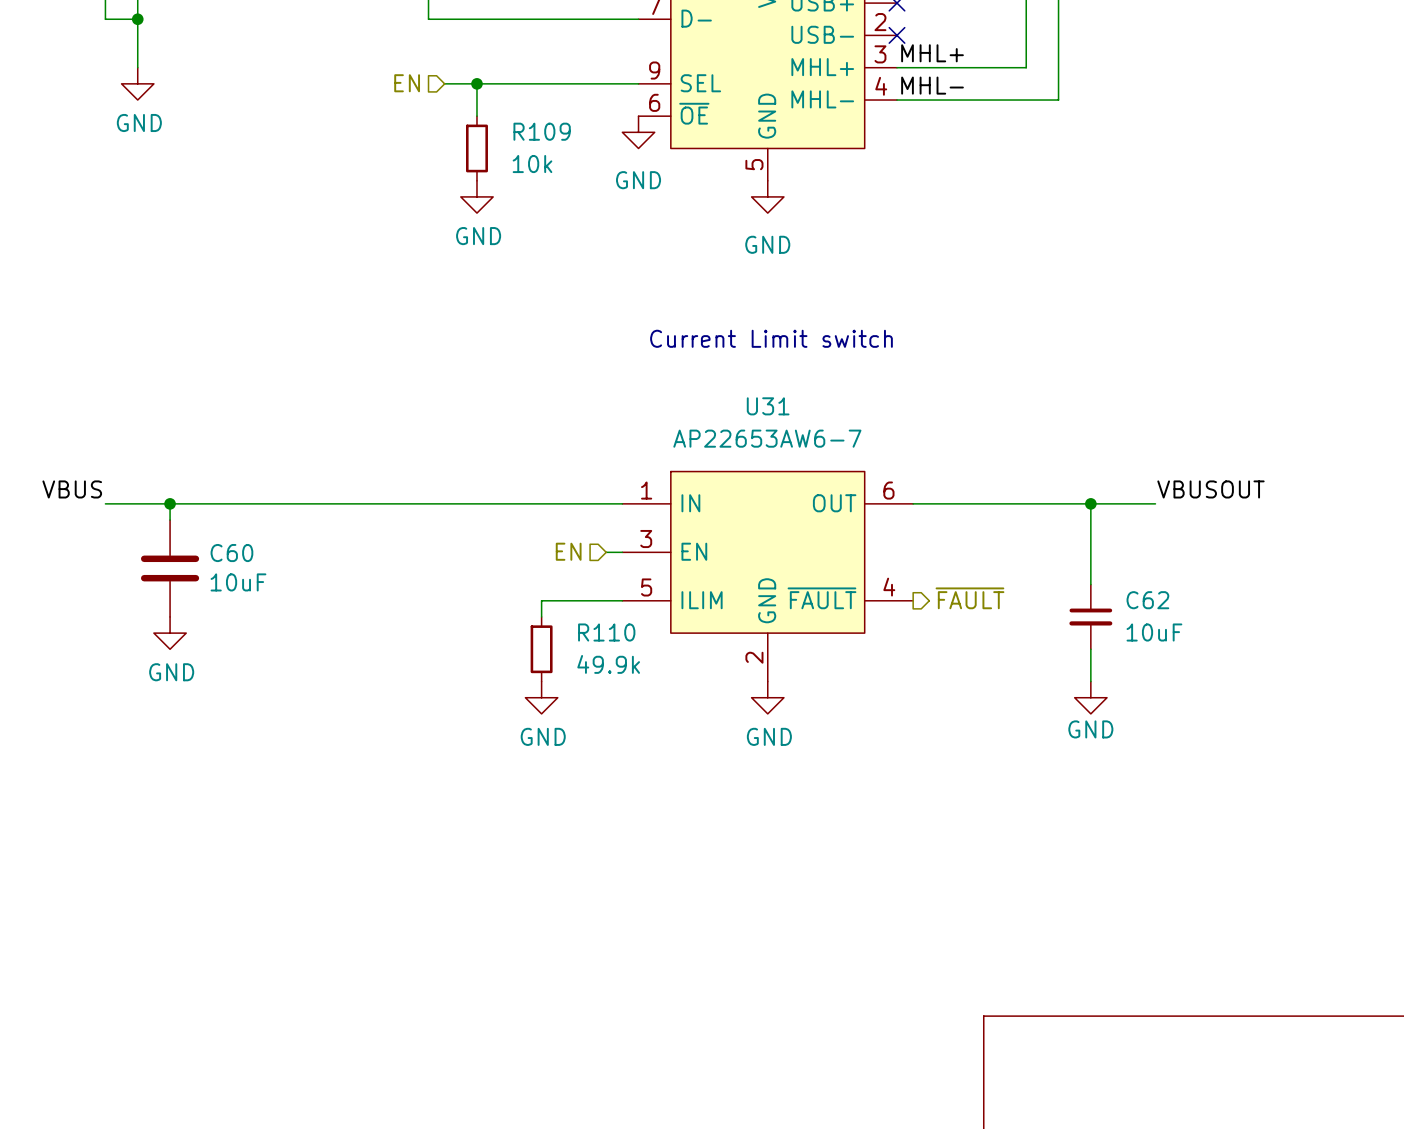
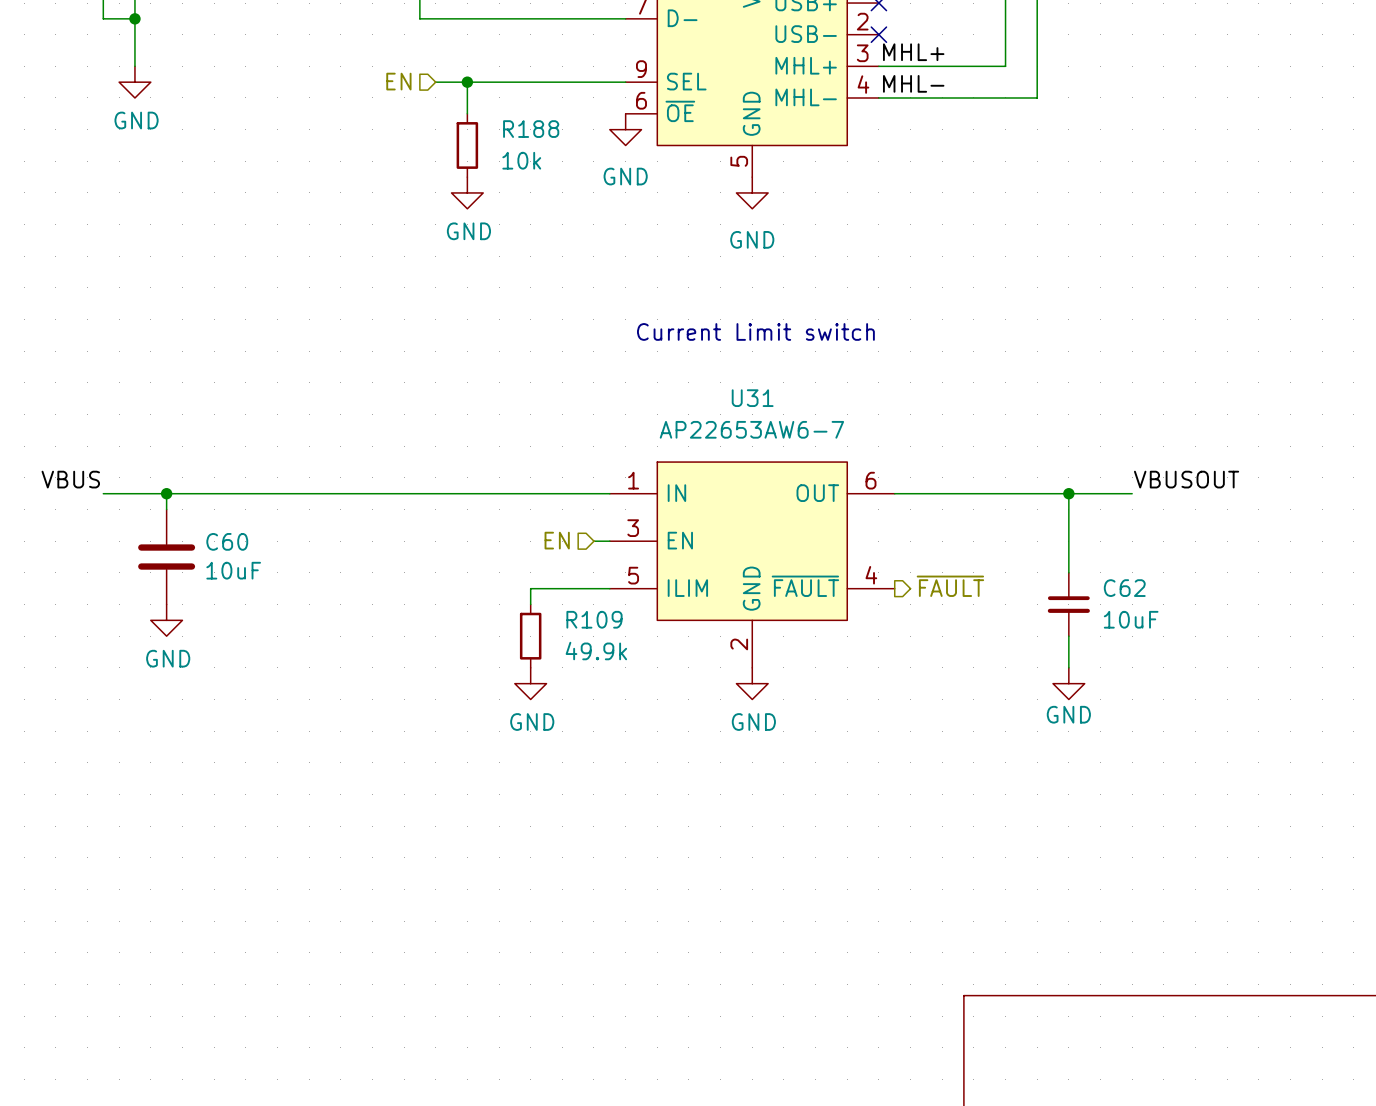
R109 name: R109 (542, 131) -> R188 (531, 129)
R110 name: R110 (606, 632) -> R109 (594, 619)

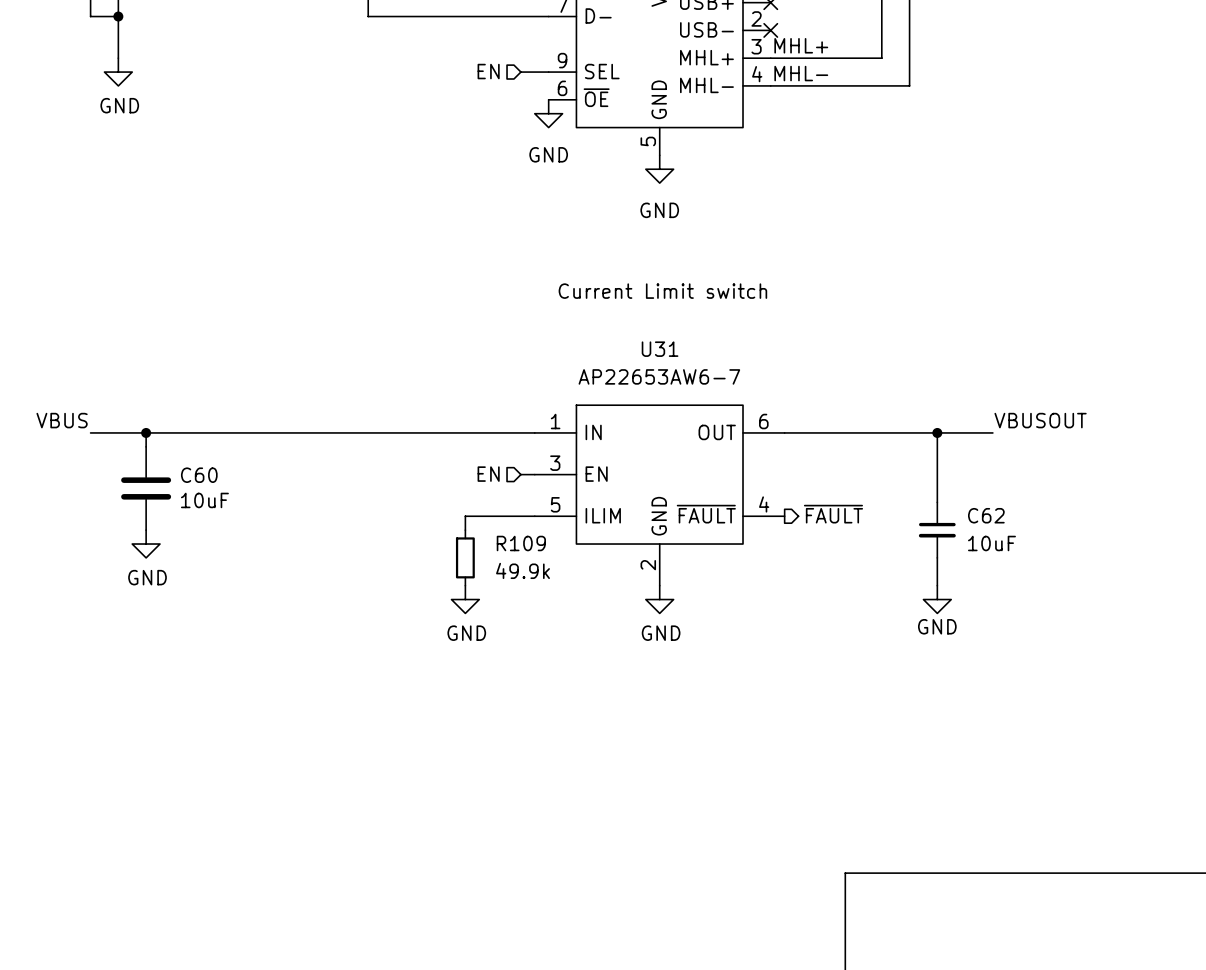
hierarchical label position: EN (398, 81) -> EN (488, 71)
wire: (435, 82) (593, 82) -> none
wire: (467, 82) (467, 113) -> none
junction: (467, 82) -> none
R188: 10k (467, 145) -> none
power symbol: GND (467, 192) -> none

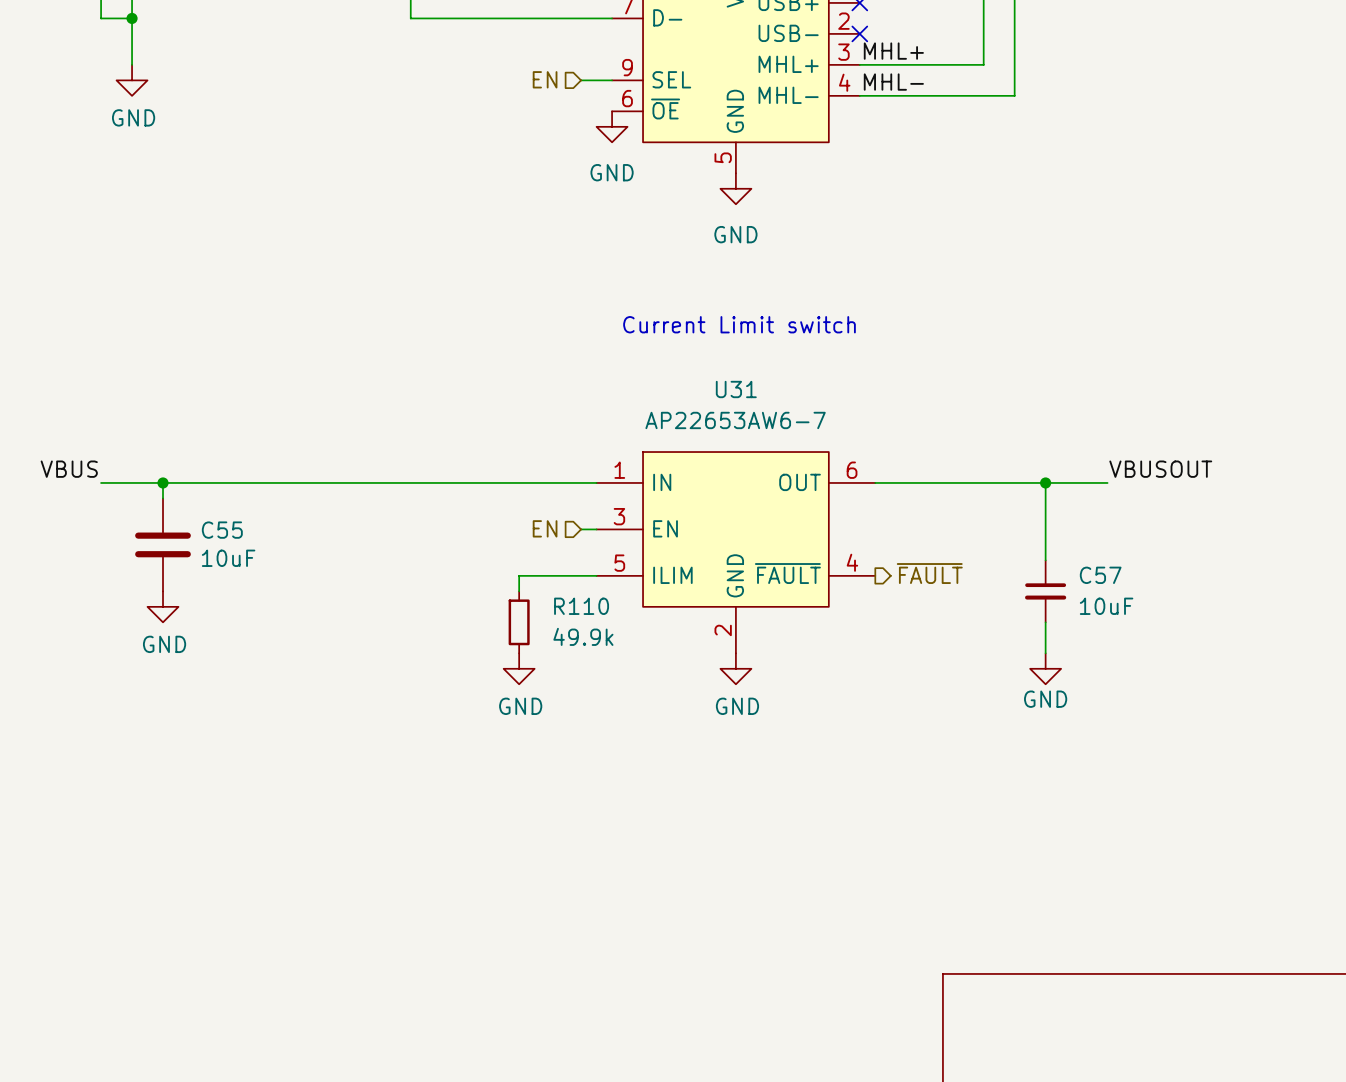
C60 name: C60 (199, 475) -> C55 (222, 530)
C62 name: C62 (986, 515) -> C57 (1100, 575)
R109 name: R109 (521, 543) -> R110 (581, 606)

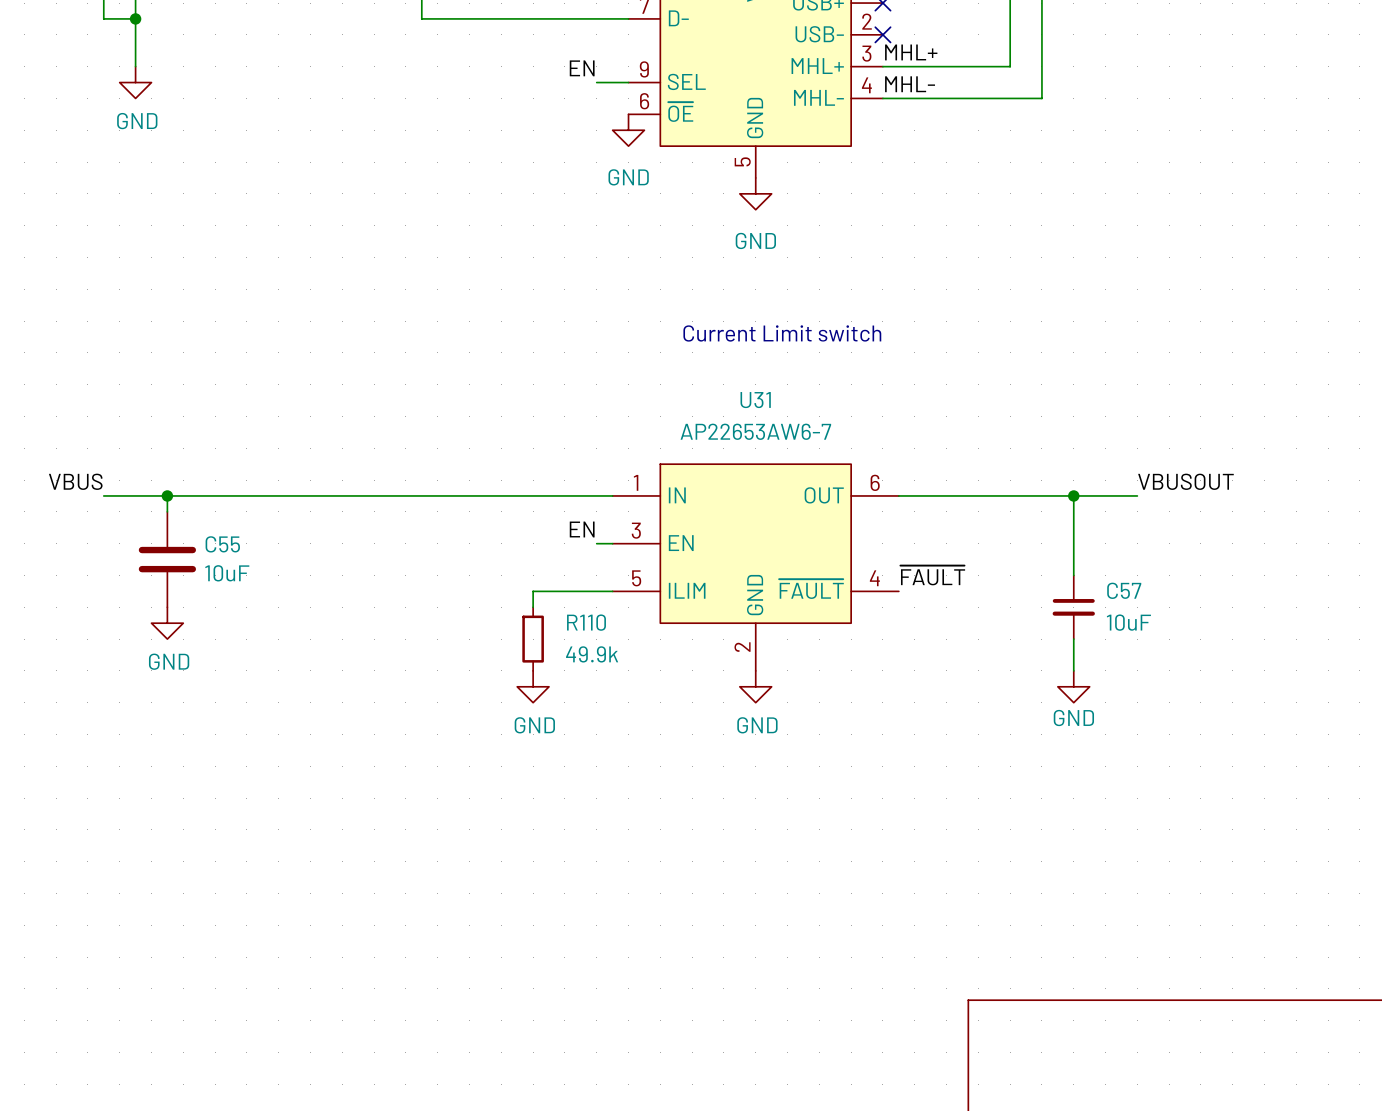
label: none -> EN (582, 68)
hierarchical label: EN (545, 79) -> none
label: none -> EN (582, 529)
hierarchical label: EN (545, 528) -> none
label: none -> ~{FAULT} (932, 575)
hierarchical label: ~{FAULT} (929, 573) -> none

